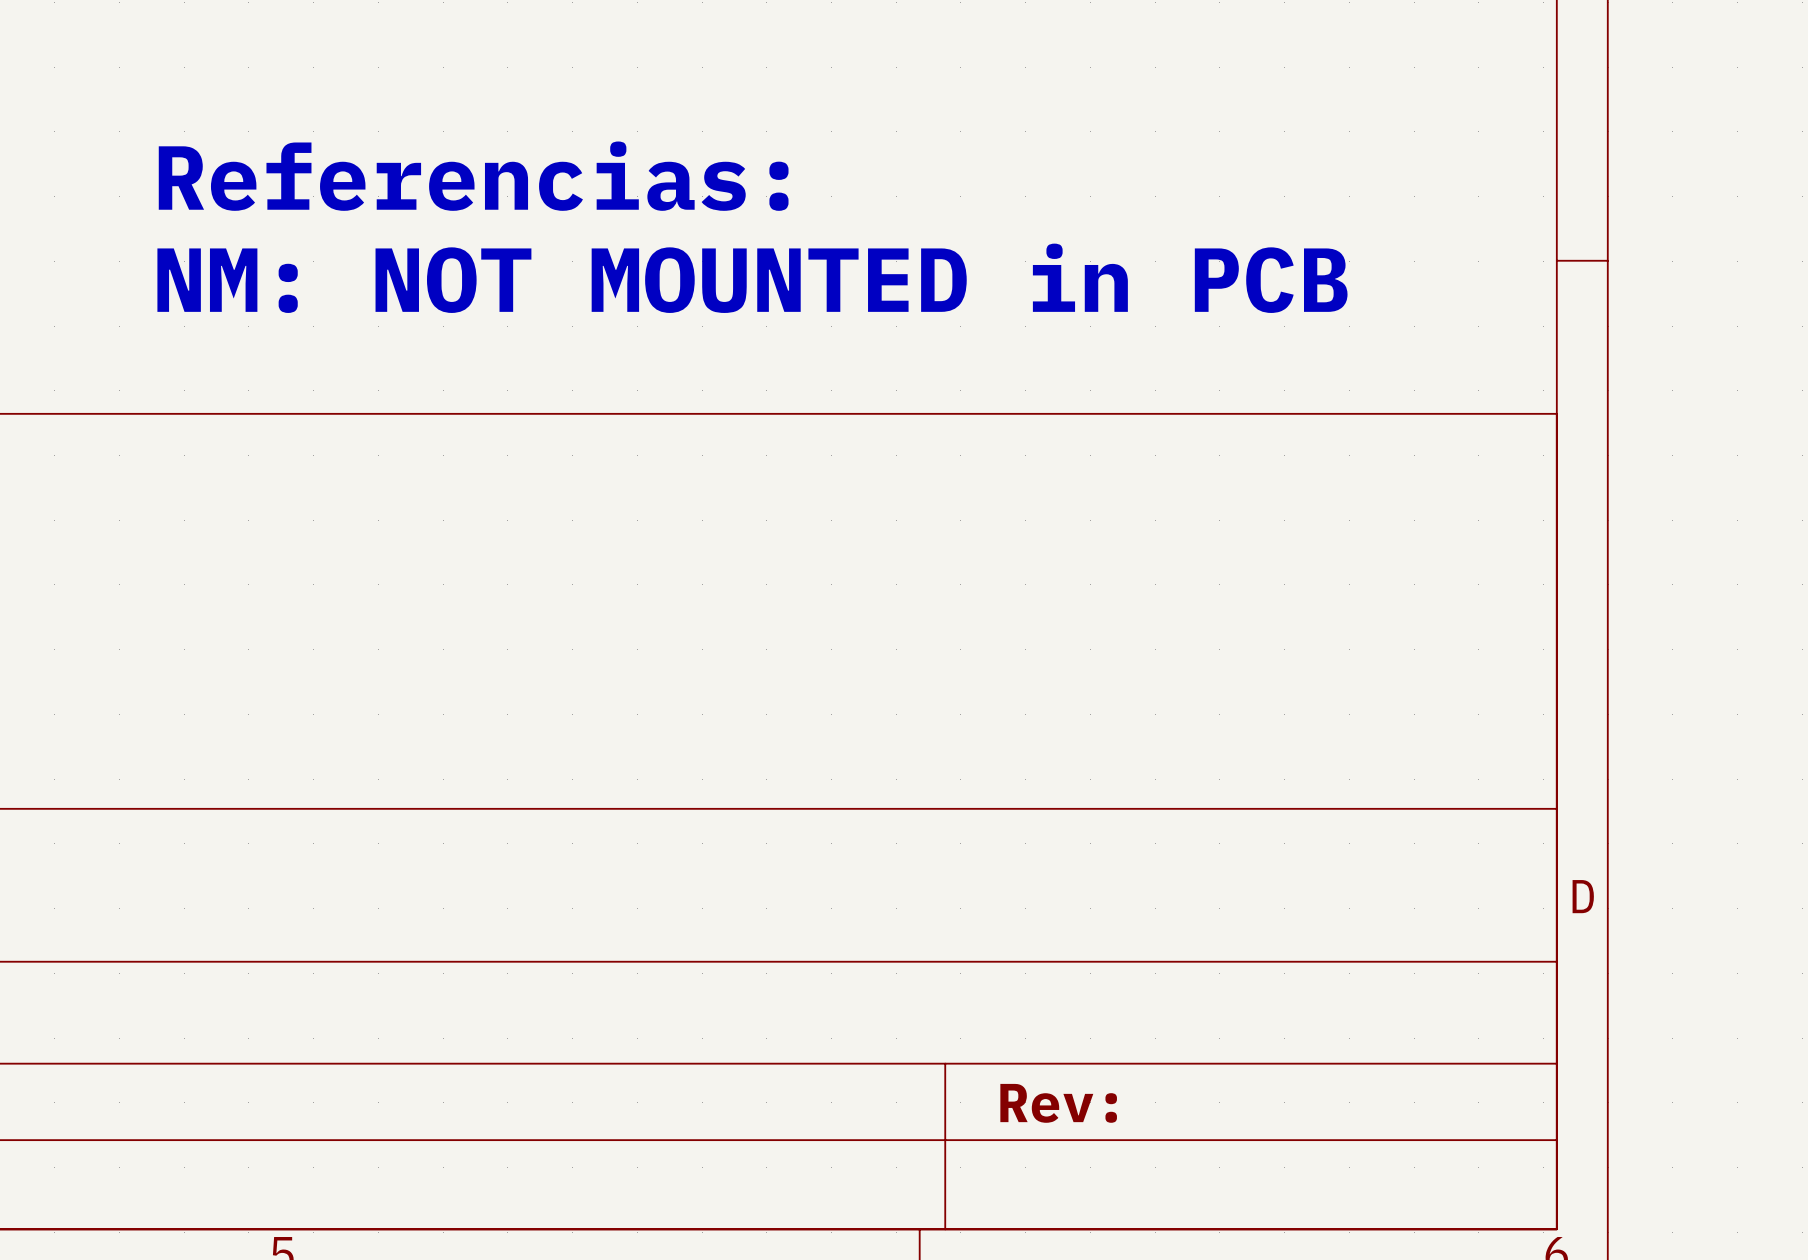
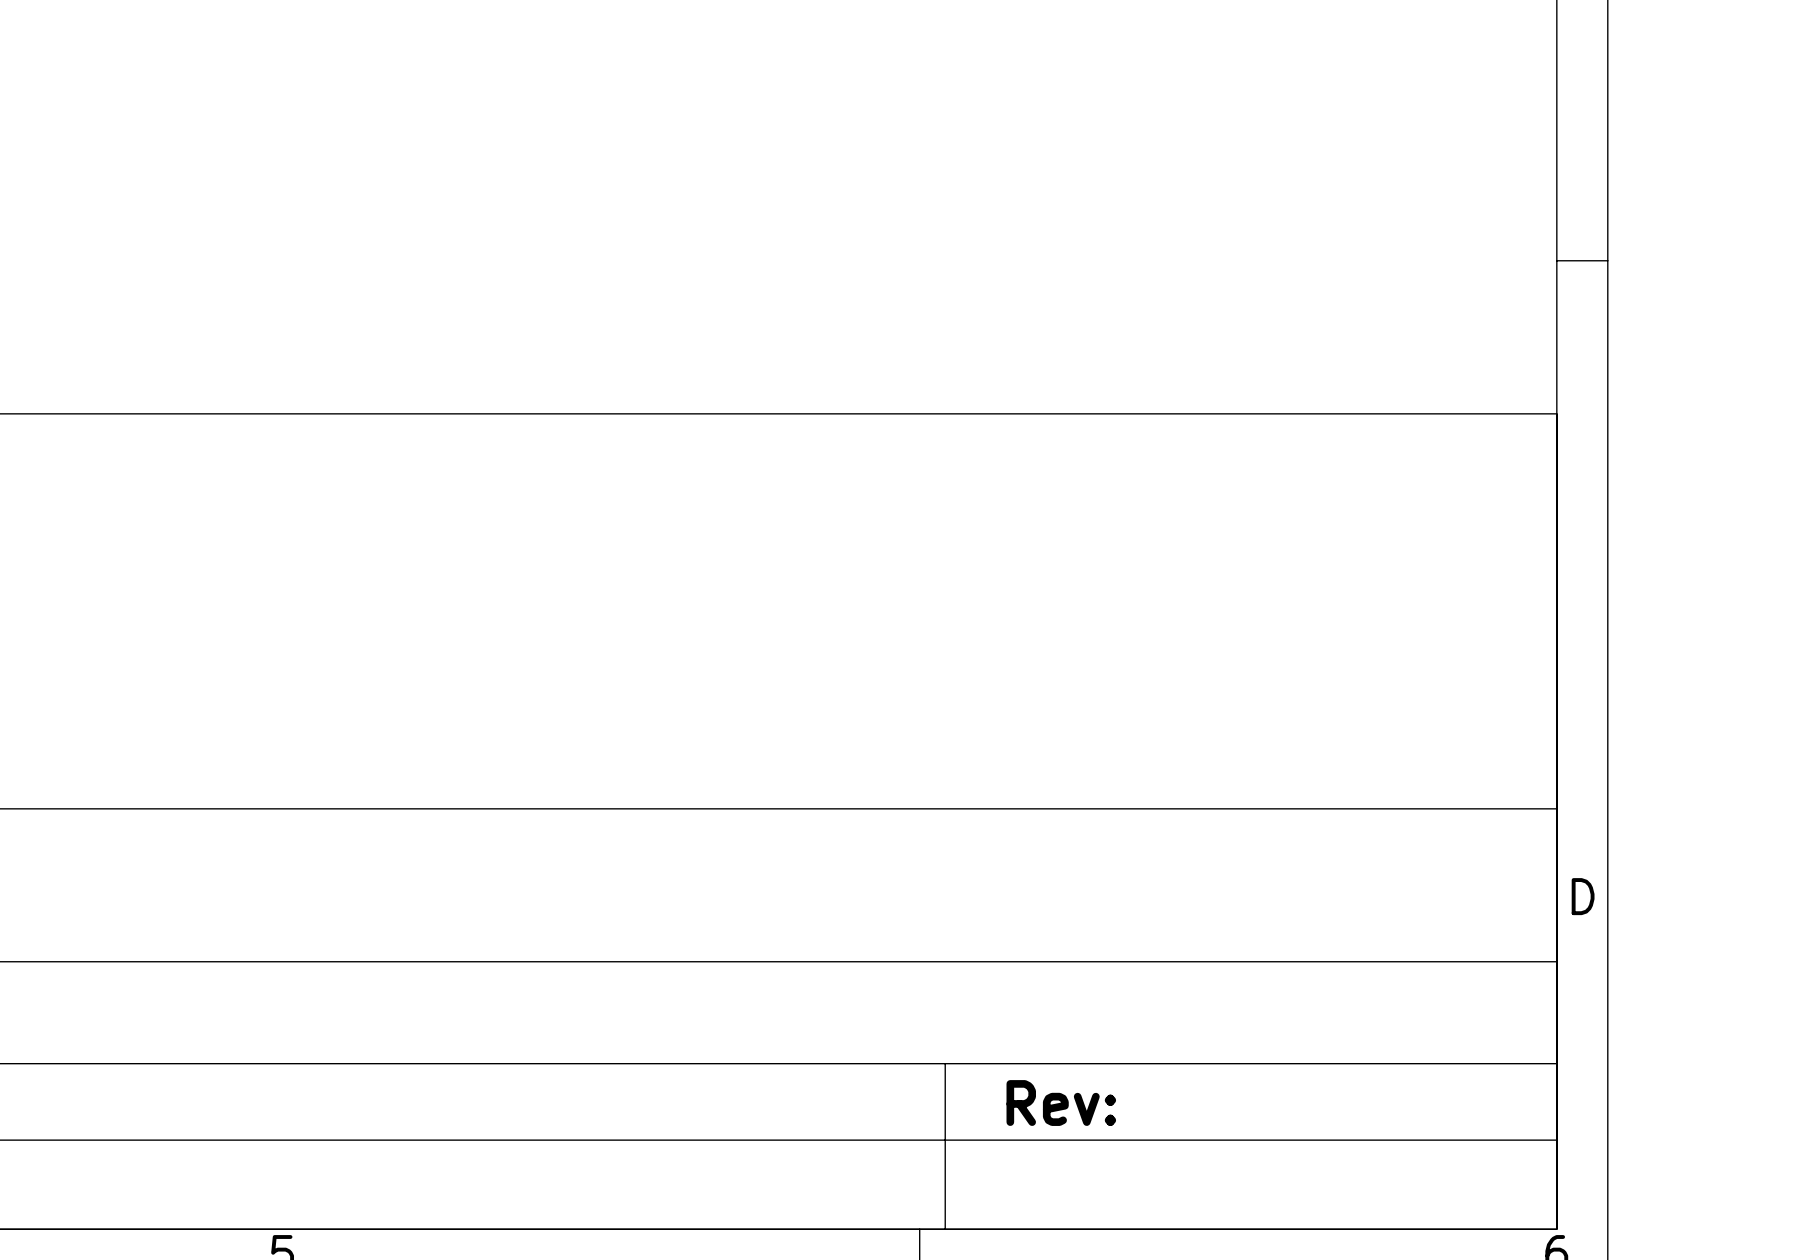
text: Referencias: (473, 176) -> none
text: NM: NOT MOUNTED in PCB (752, 278) -> none

